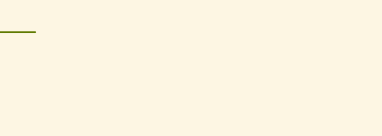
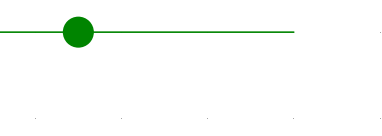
wire: none -> (35, 32) (293, 32)
junction: none -> (78, 32)

